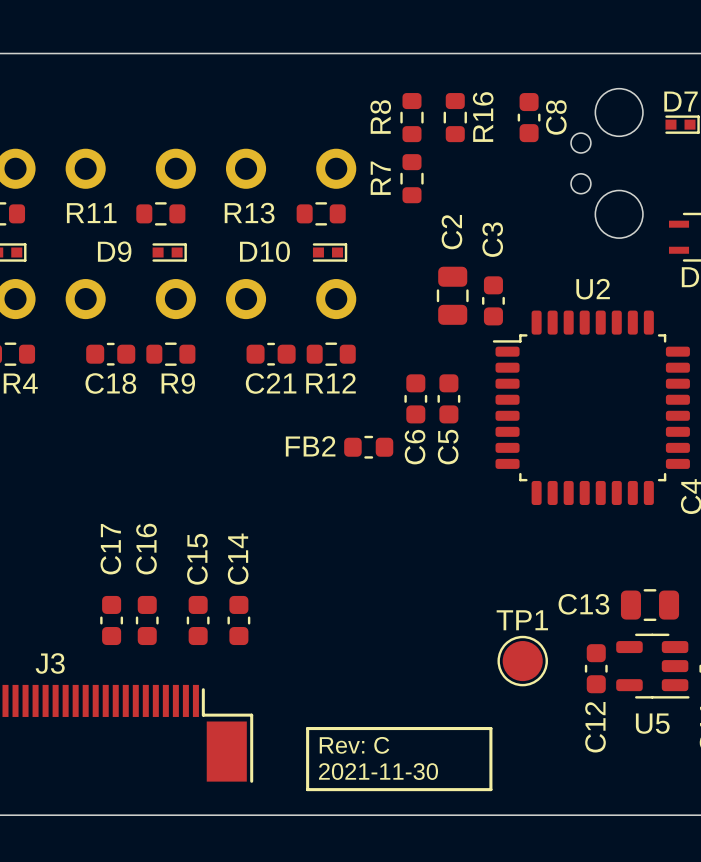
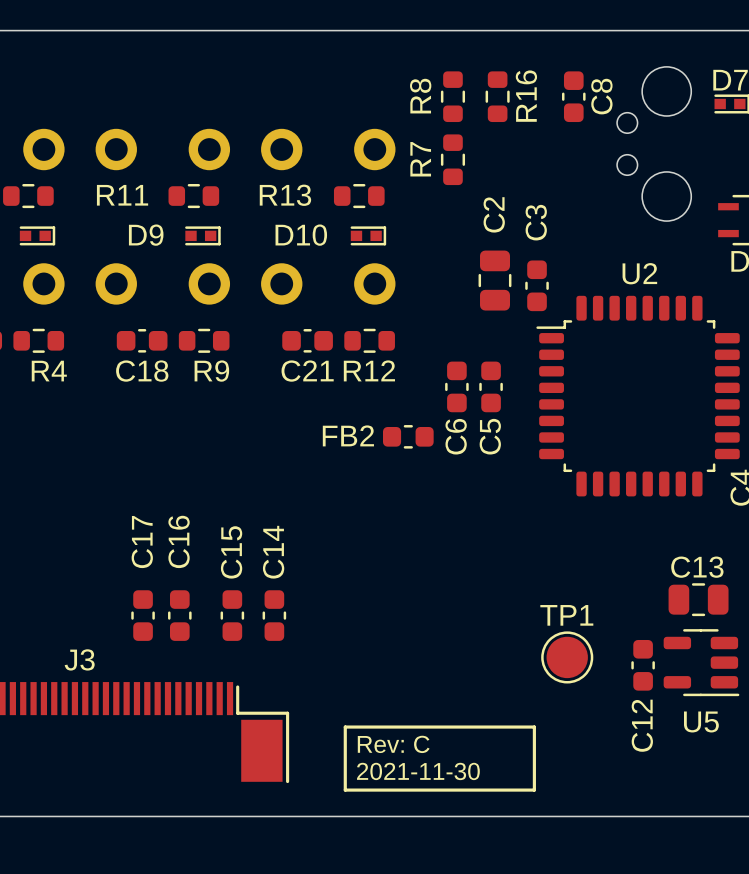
C13 name position: C13 (583, 604) -> C13 (697, 567)

